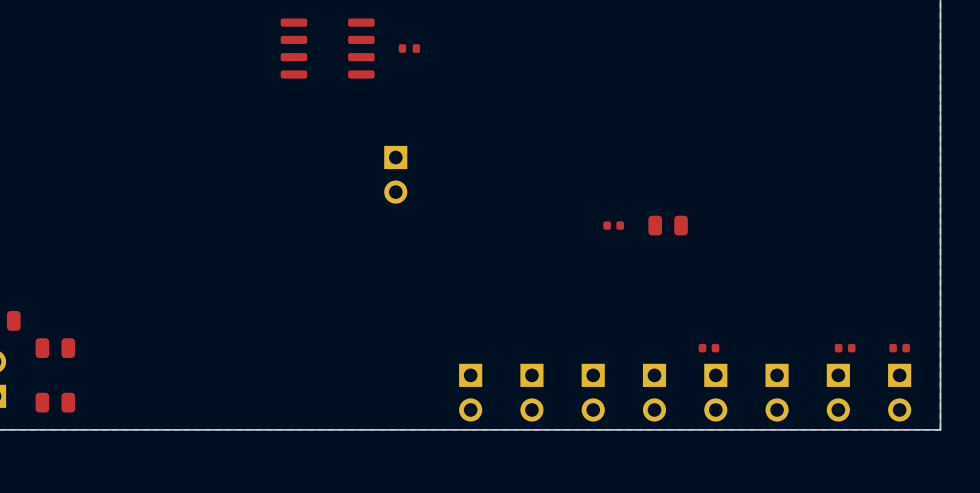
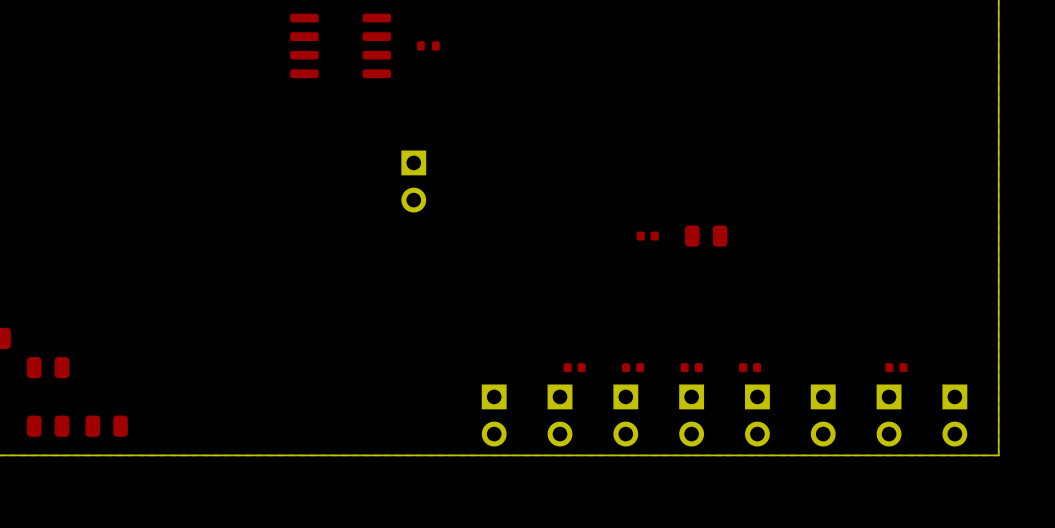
part: none -> (574, 367)
part: none -> (633, 367)
part: none -> (691, 367)
part: (899, 348) -> none
part: none -> (106, 426)

